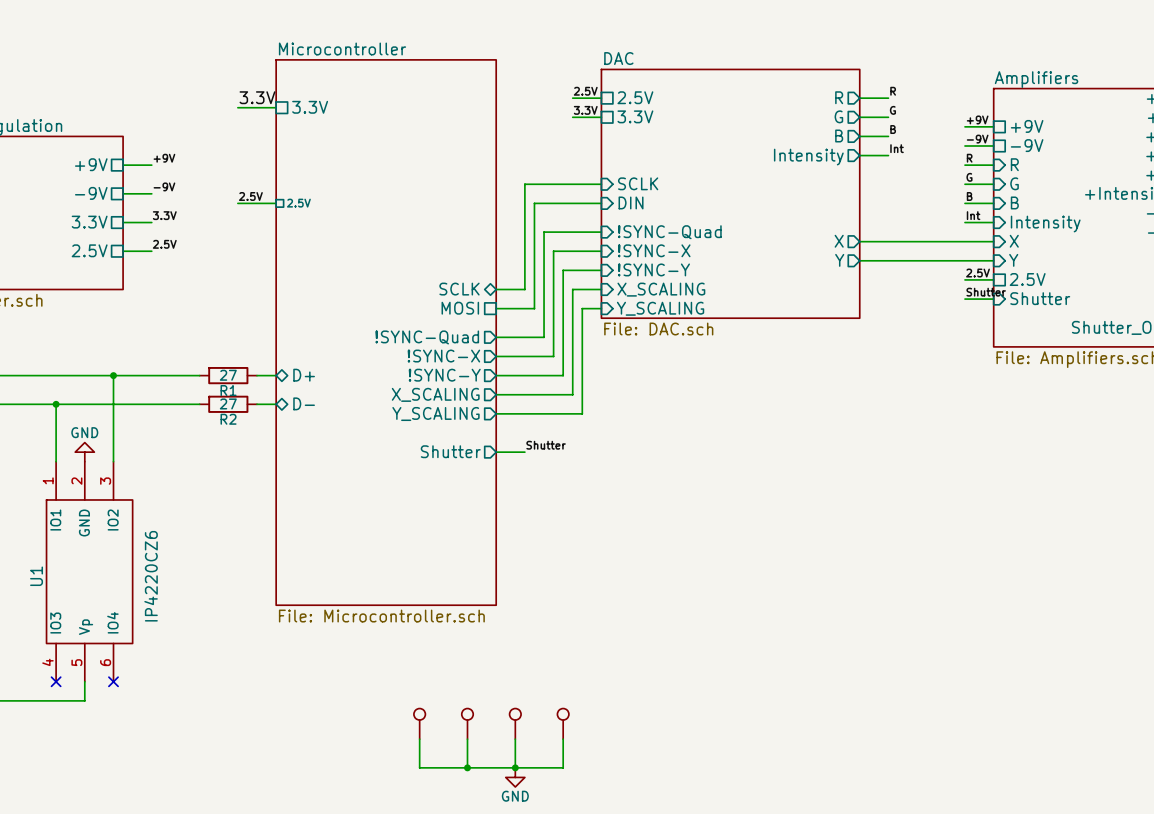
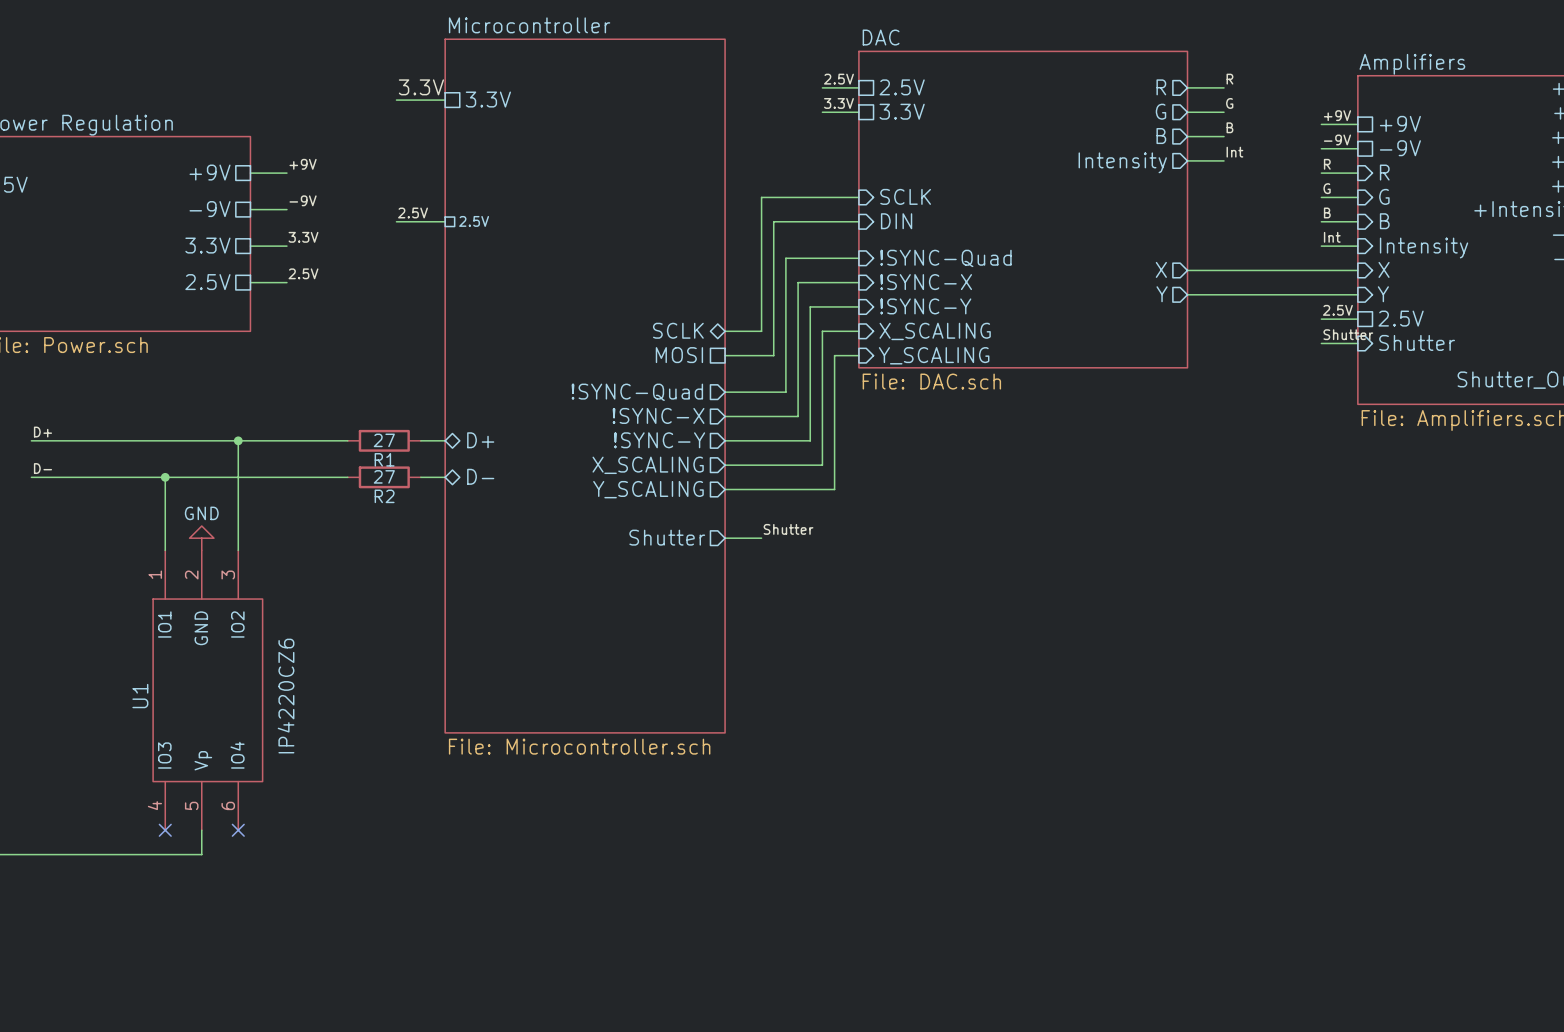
part: (419, 723) -> none
part: (467, 723) -> none
part: (515, 723) -> none
part: (563, 723) -> none
wire: (419, 739) (419, 767) (563, 767) (563, 739) -> none
wire: (467, 739) (467, 767) -> none
wire: (515, 739) (515, 767) -> none
junction: (467, 767) -> none
junction: (515, 767) -> none
power symbol: GND (515, 777) -> none

